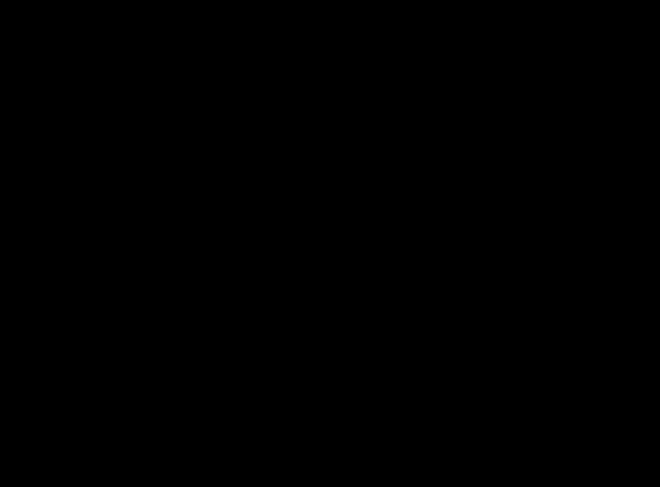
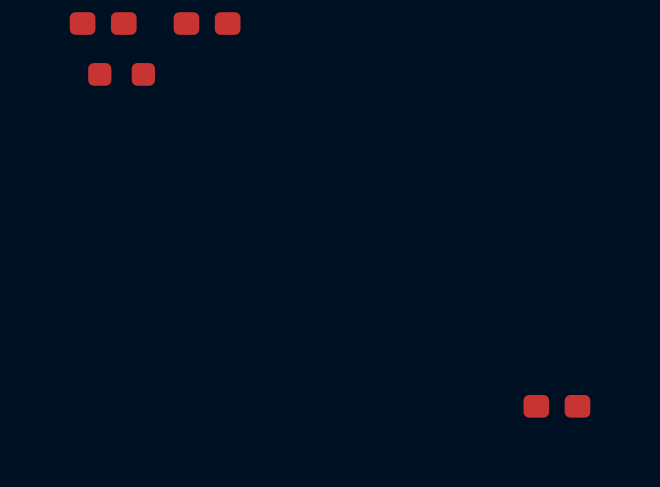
part: none -> (103, 23)
part: none -> (207, 23)
part: none -> (121, 74)
part: none -> (556, 406)

